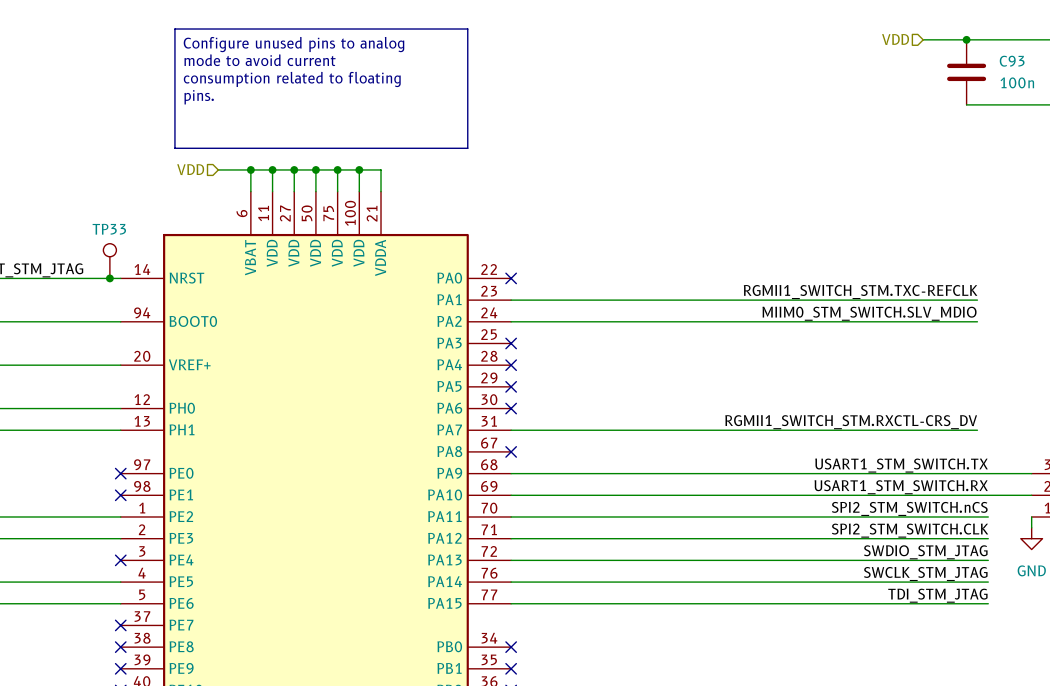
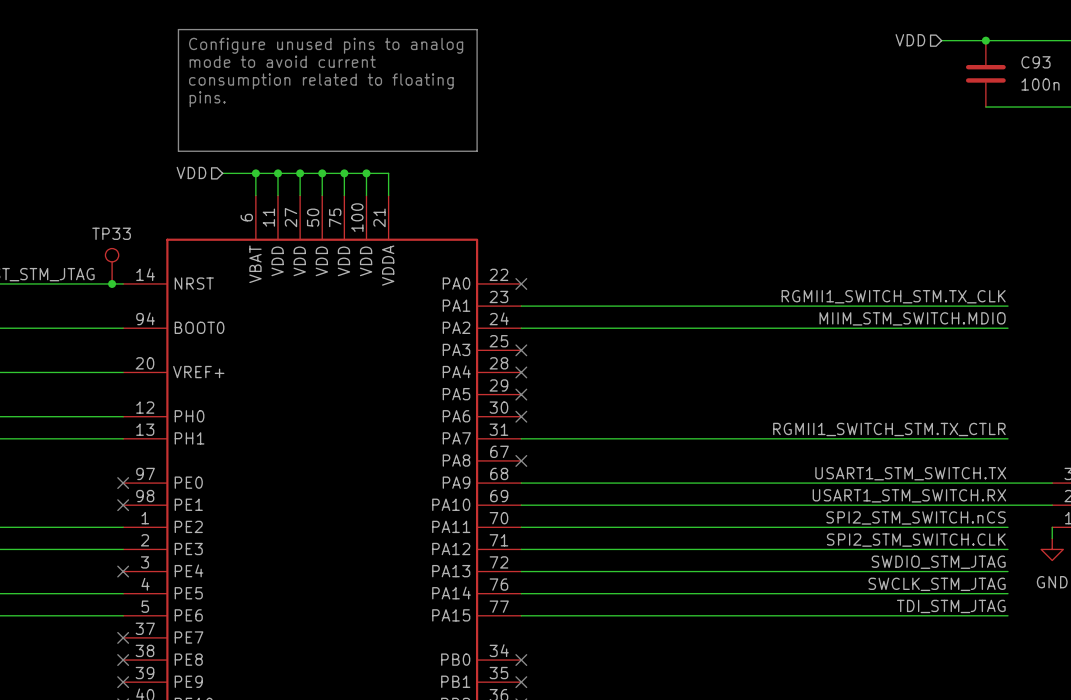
label: RGMII1_SWITCH_STM.TXC-REFCLK (860, 292) -> RGMII1_SWITCH_STM.TX_CLK (893, 296)
wire: none -> (996, 306) (1008, 306)
label: MIIM0_STM_SWITCH.SLV_MDIO (869, 313) -> MIIM_STM_SWITCH.MDIO (912, 318)
wire: none -> (996, 328) (1008, 328)
label: RGMII1_SWITCH_STM.RXCTL-CRS_DV (851, 422) -> RGMII1_SWITCH_STM.TX_CTLR (889, 429)
wire: none -> (996, 438) (1008, 438)

